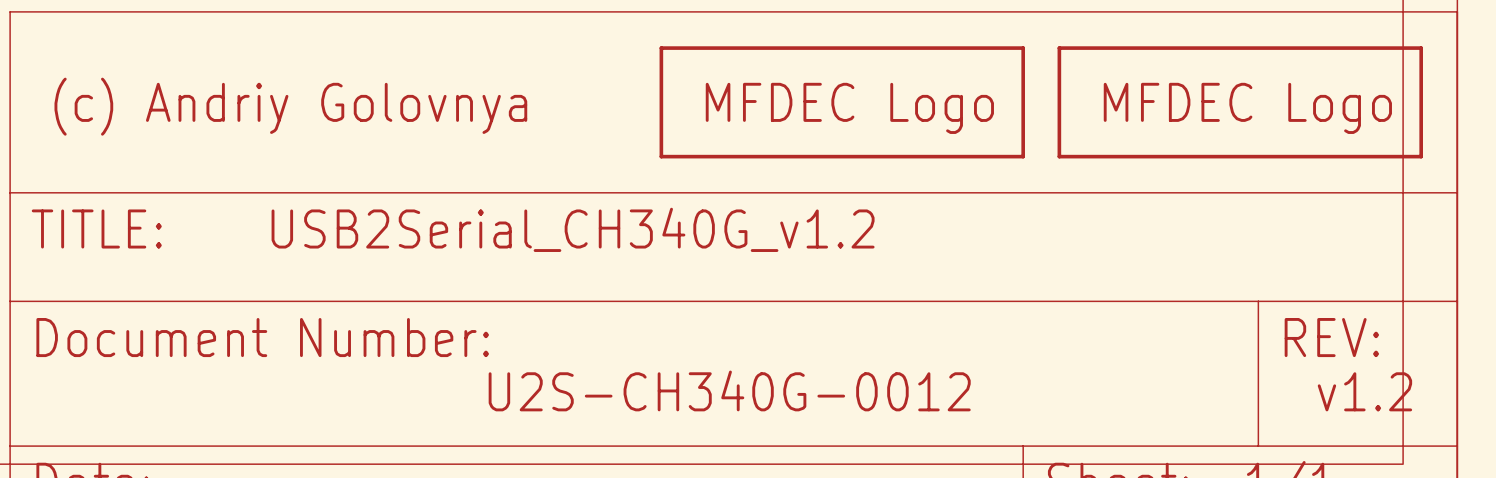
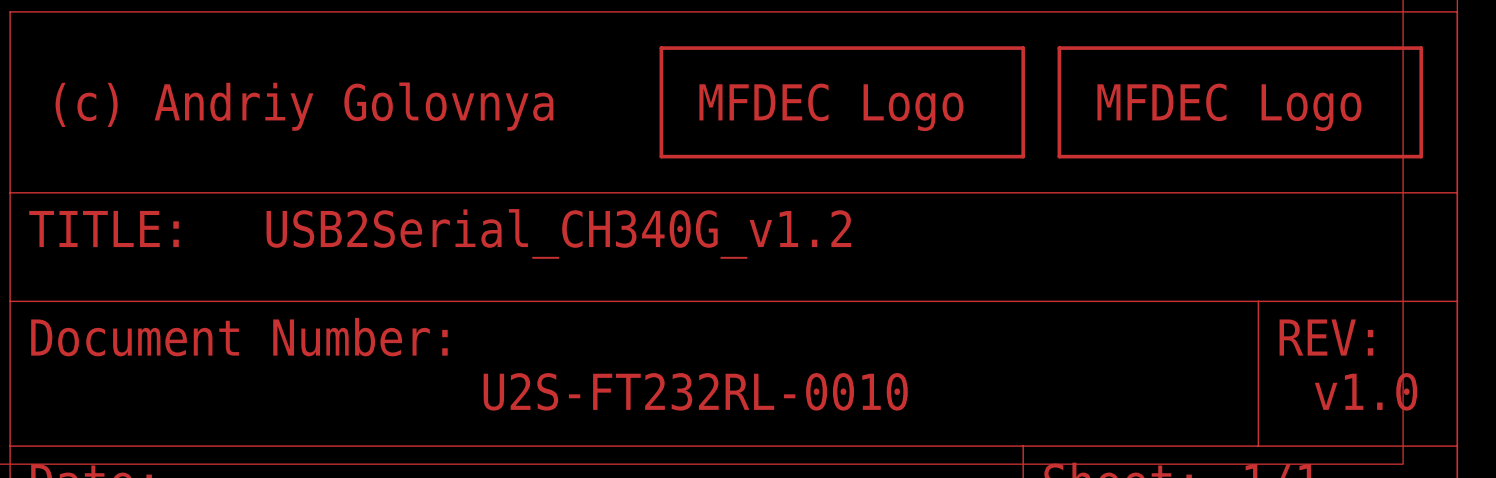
text: U2S-CH340G-0012 (729, 390) -> U2S-FT232RL-0010 (695, 391)
text: v1.2 (1364, 391) -> v1.0 (1366, 391)

